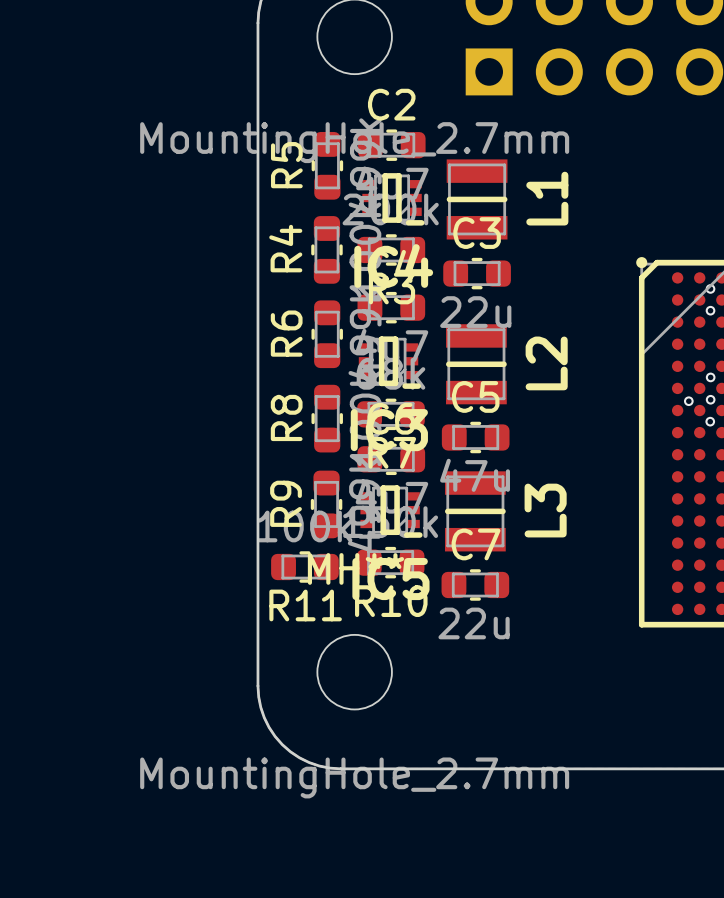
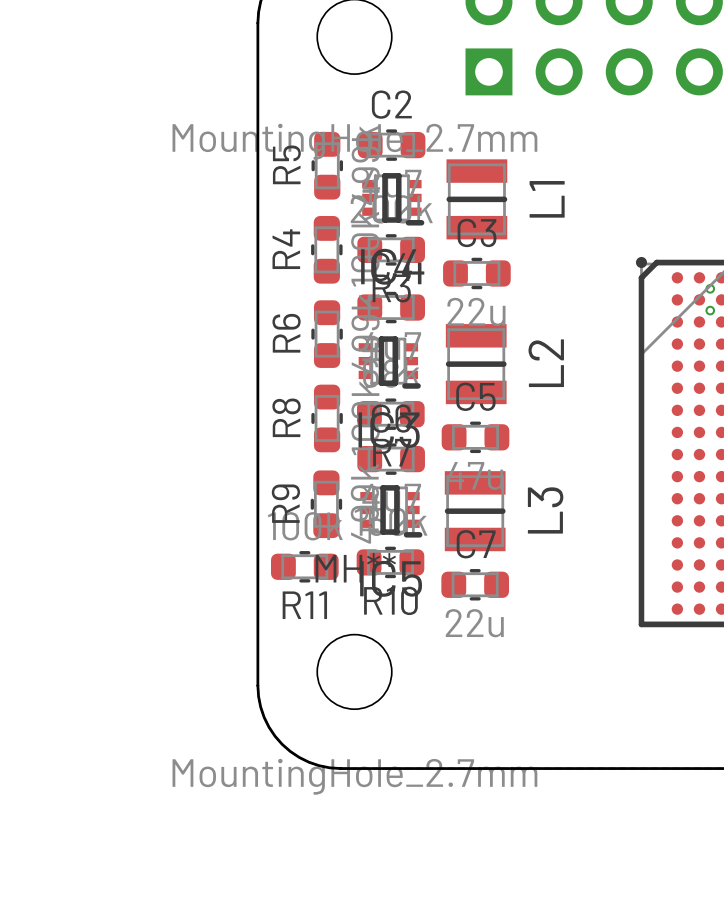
via: (710, 377) -> none
via: (710, 399) -> none
via: (688, 401) -> none
via: (710, 421) -> none

